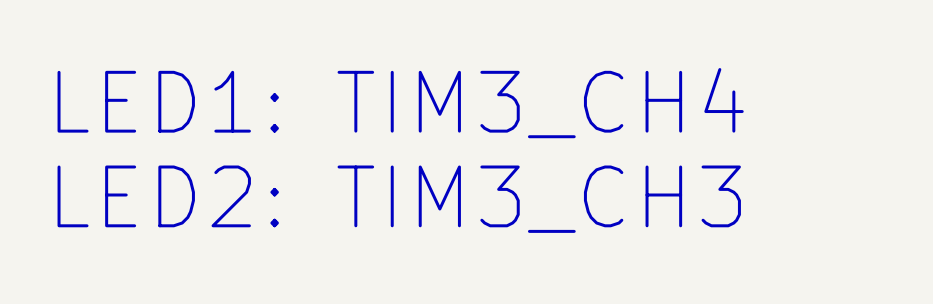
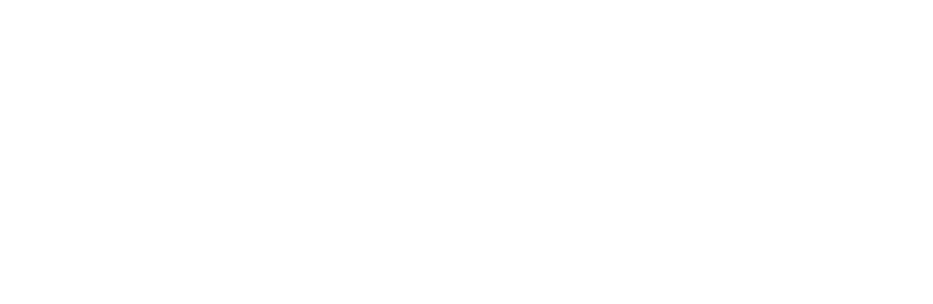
text: LED1: TIM3_CH4 (400, 103) -> none
text: LED2: TIM3_CH3 (399, 199) -> none

